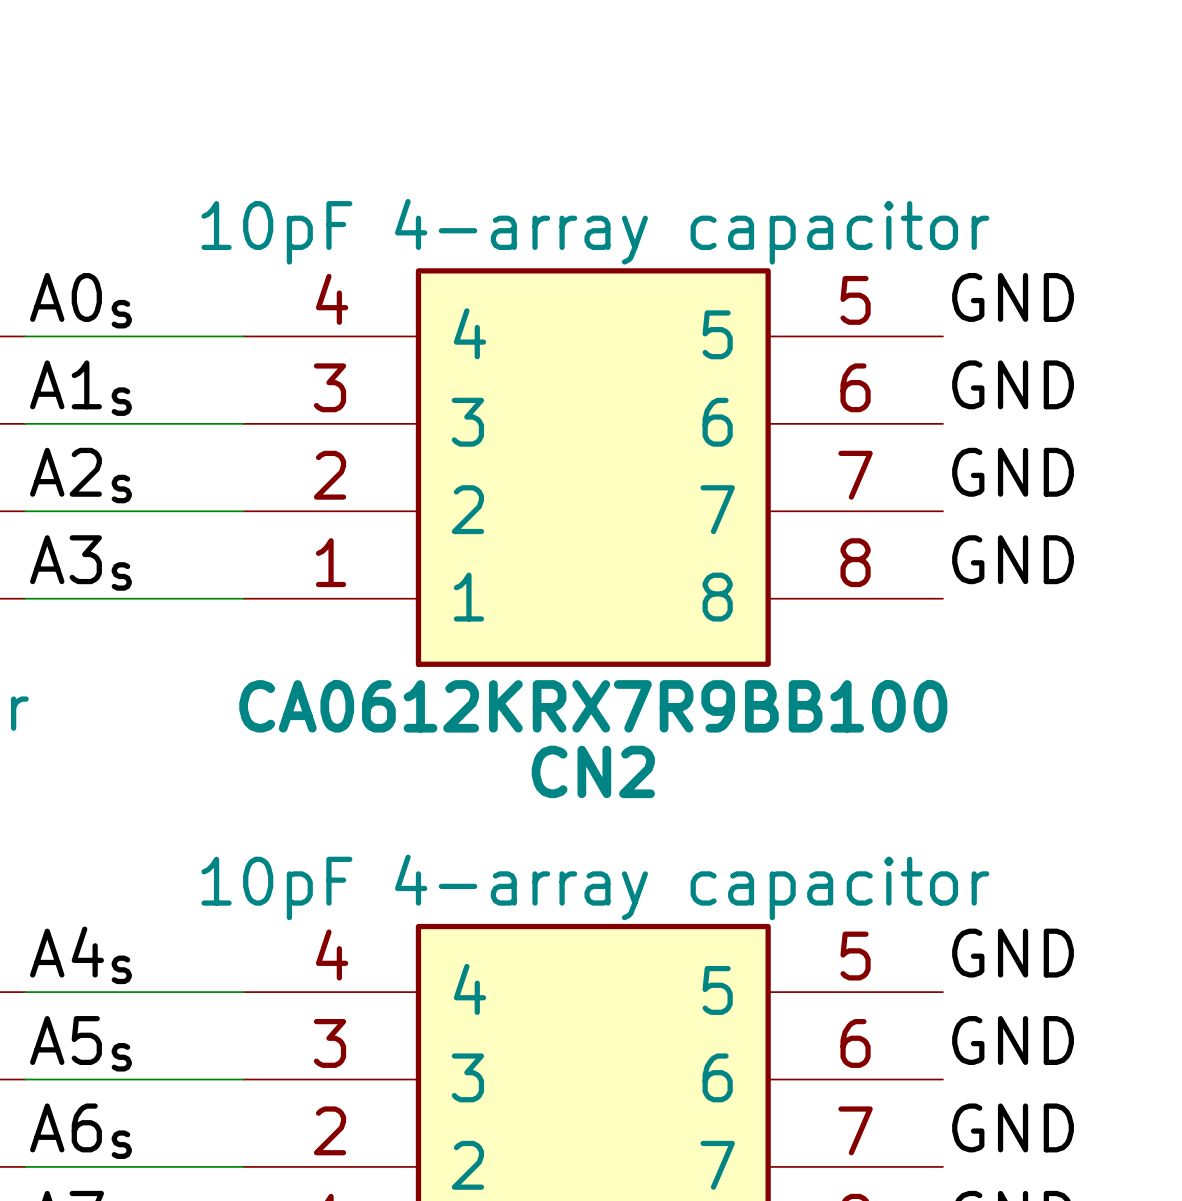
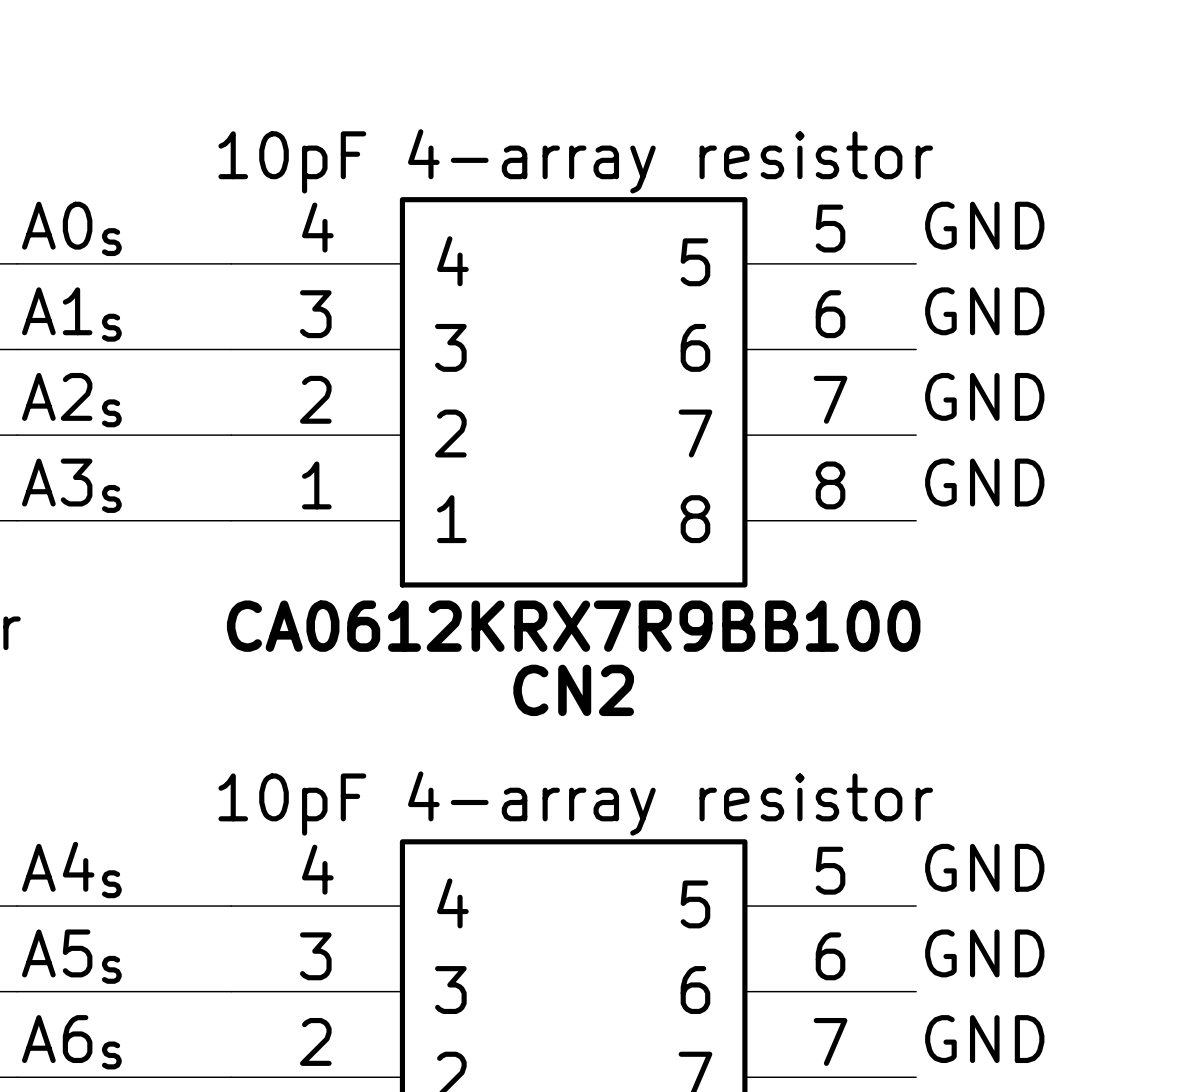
CN2 text: 10pF 4-array capacitor (595, 231) -> 10pF 4-array resistor (575, 161)
part text: 10pF 4-array capacitor (595, 887) -> 10pF 4-array resistor (575, 803)

